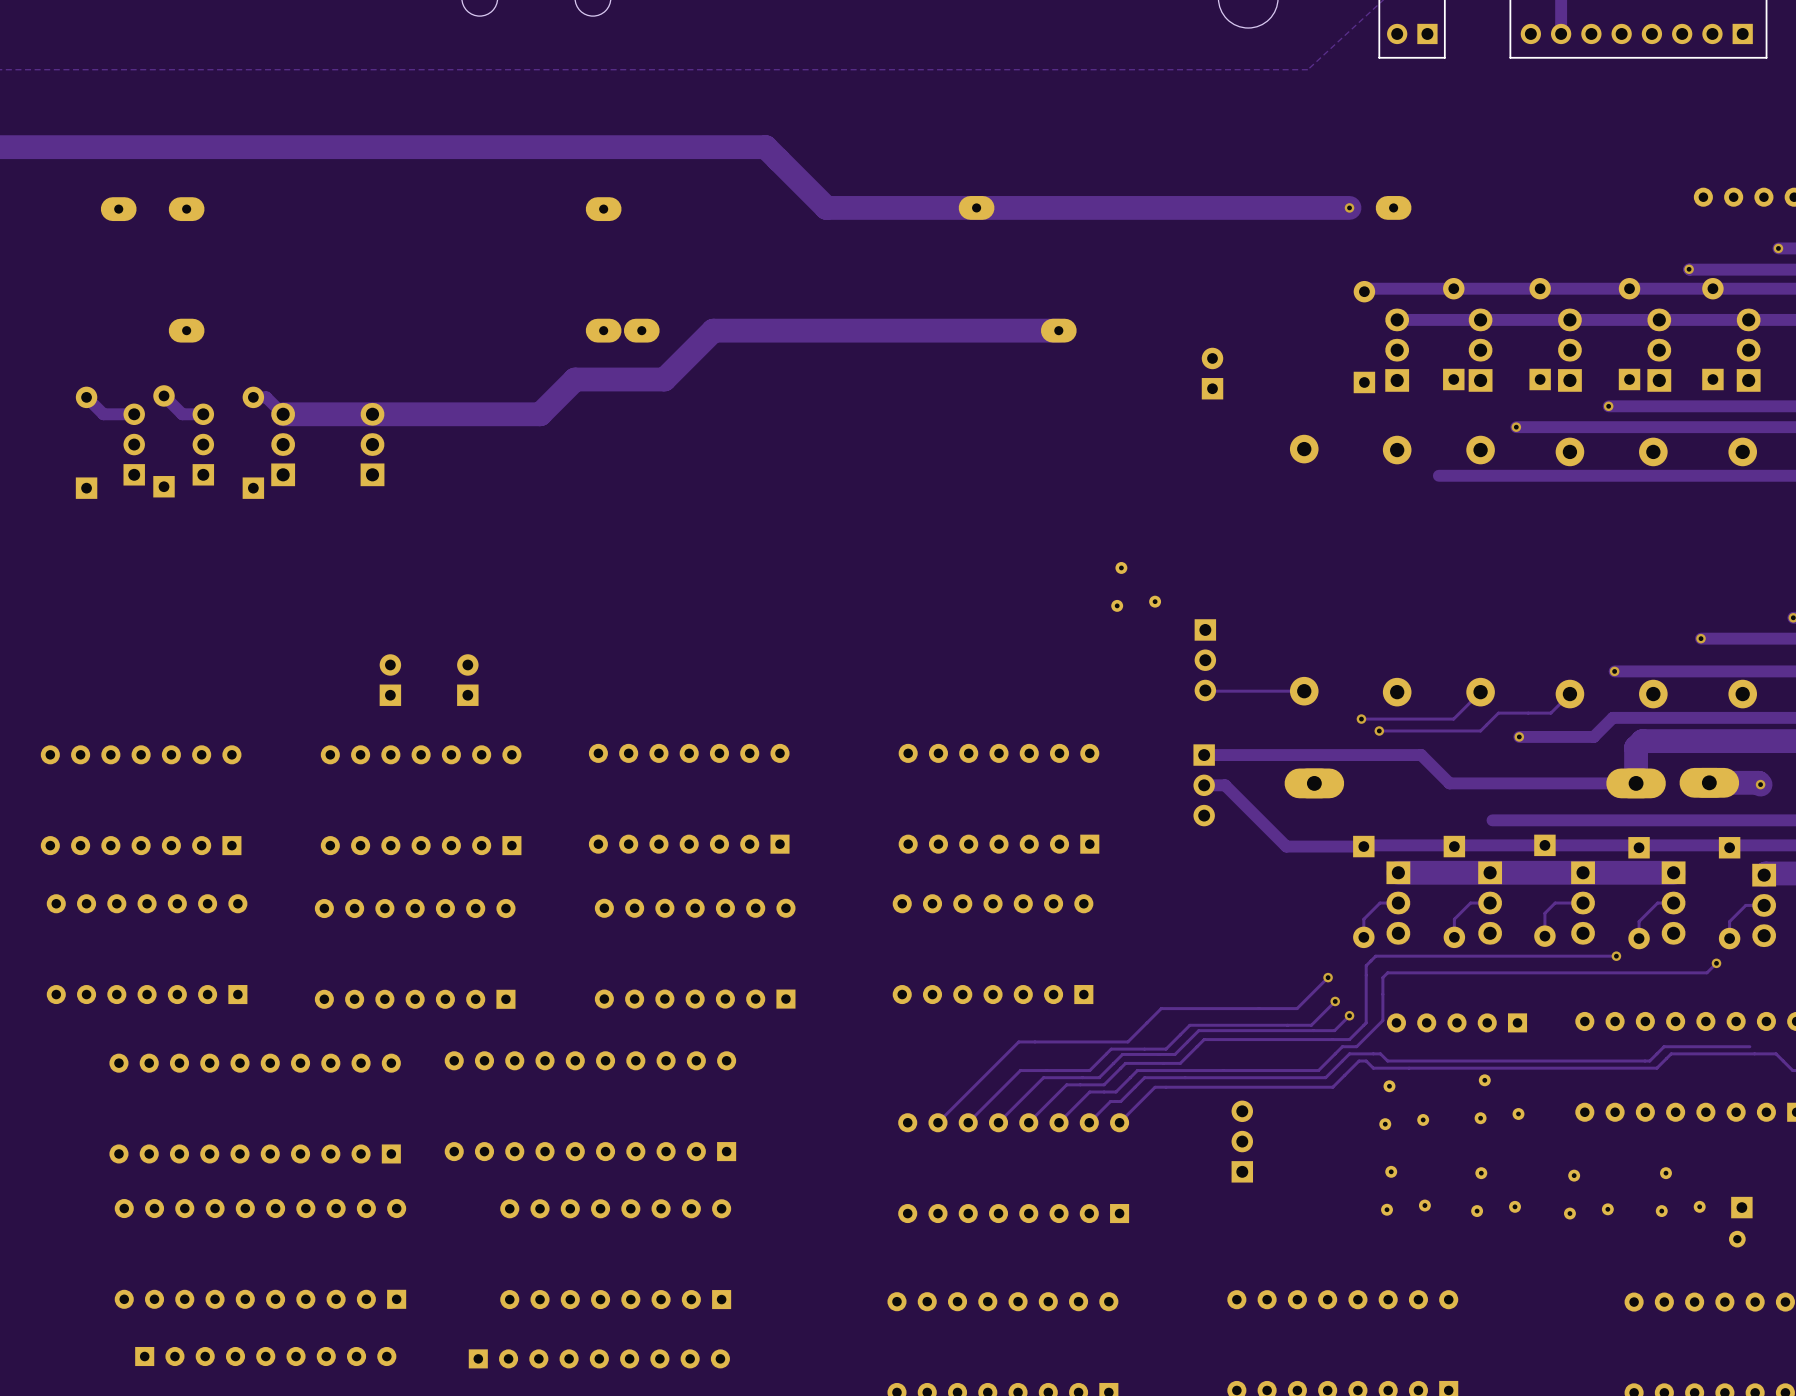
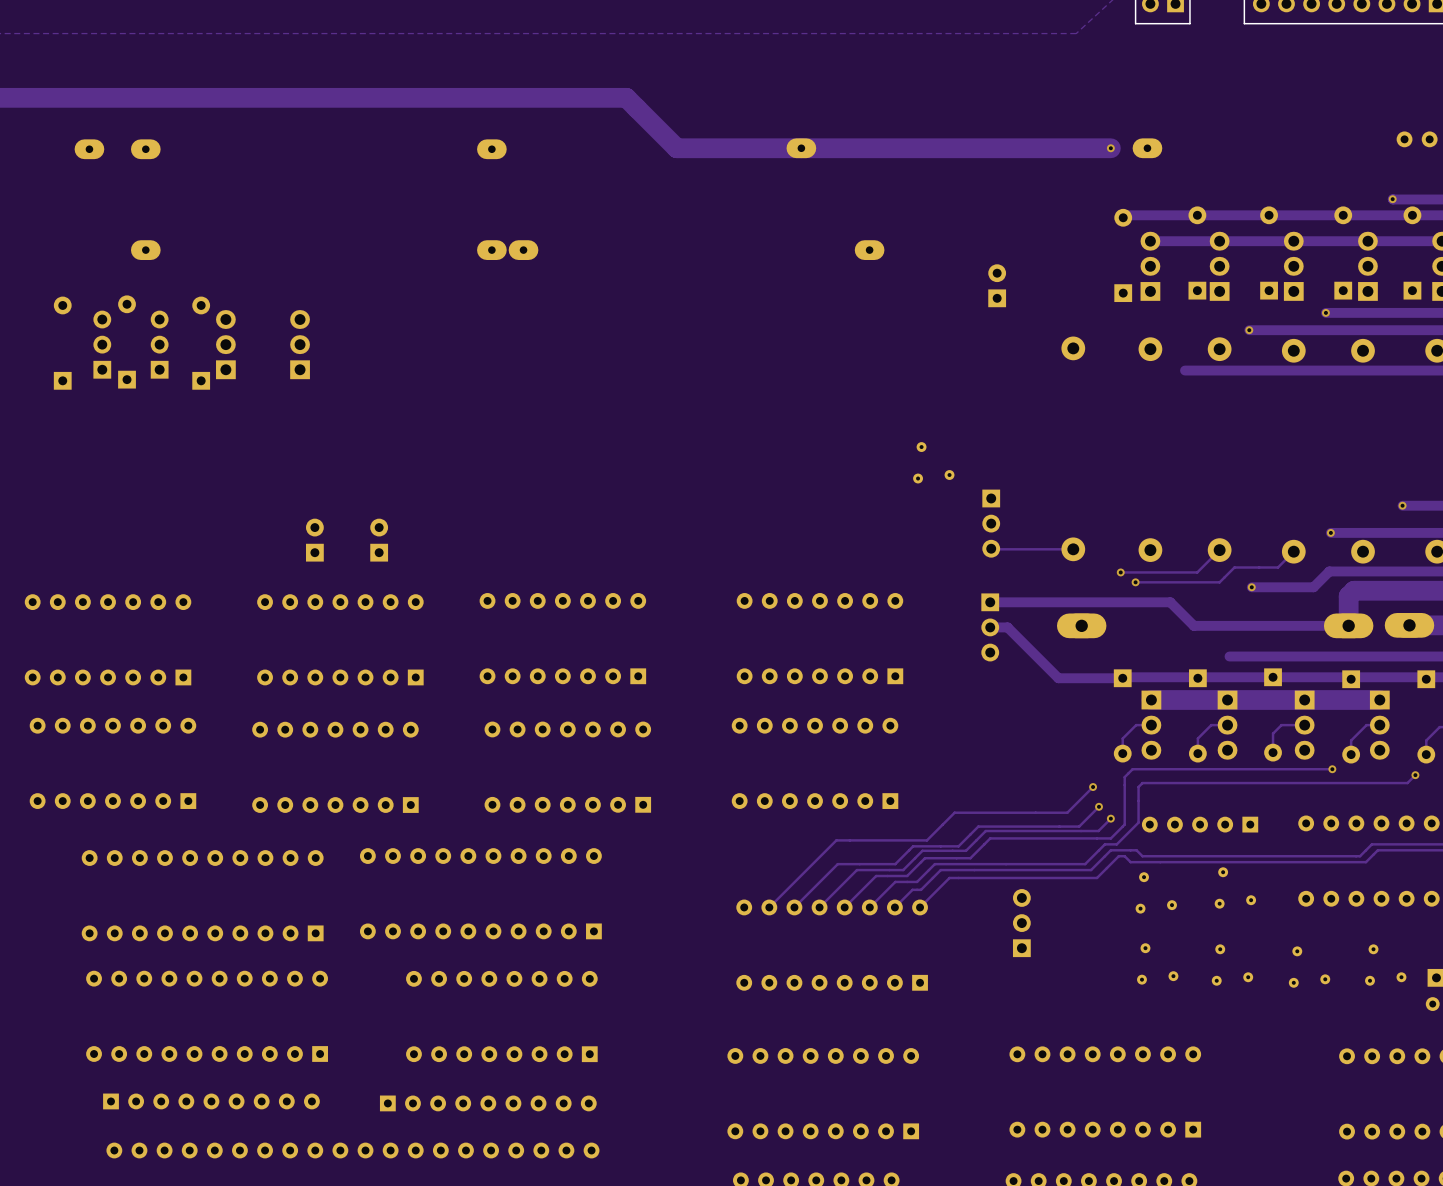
track: (1058, 330) (713, 330) (664, 379) (575, 379) (540, 414) (283, 414) (266, 397) (253, 397) -> none
track: (164, 395) (182, 414) (203, 414) -> none
track: (86, 397) (103, 414) (134, 414) -> none

